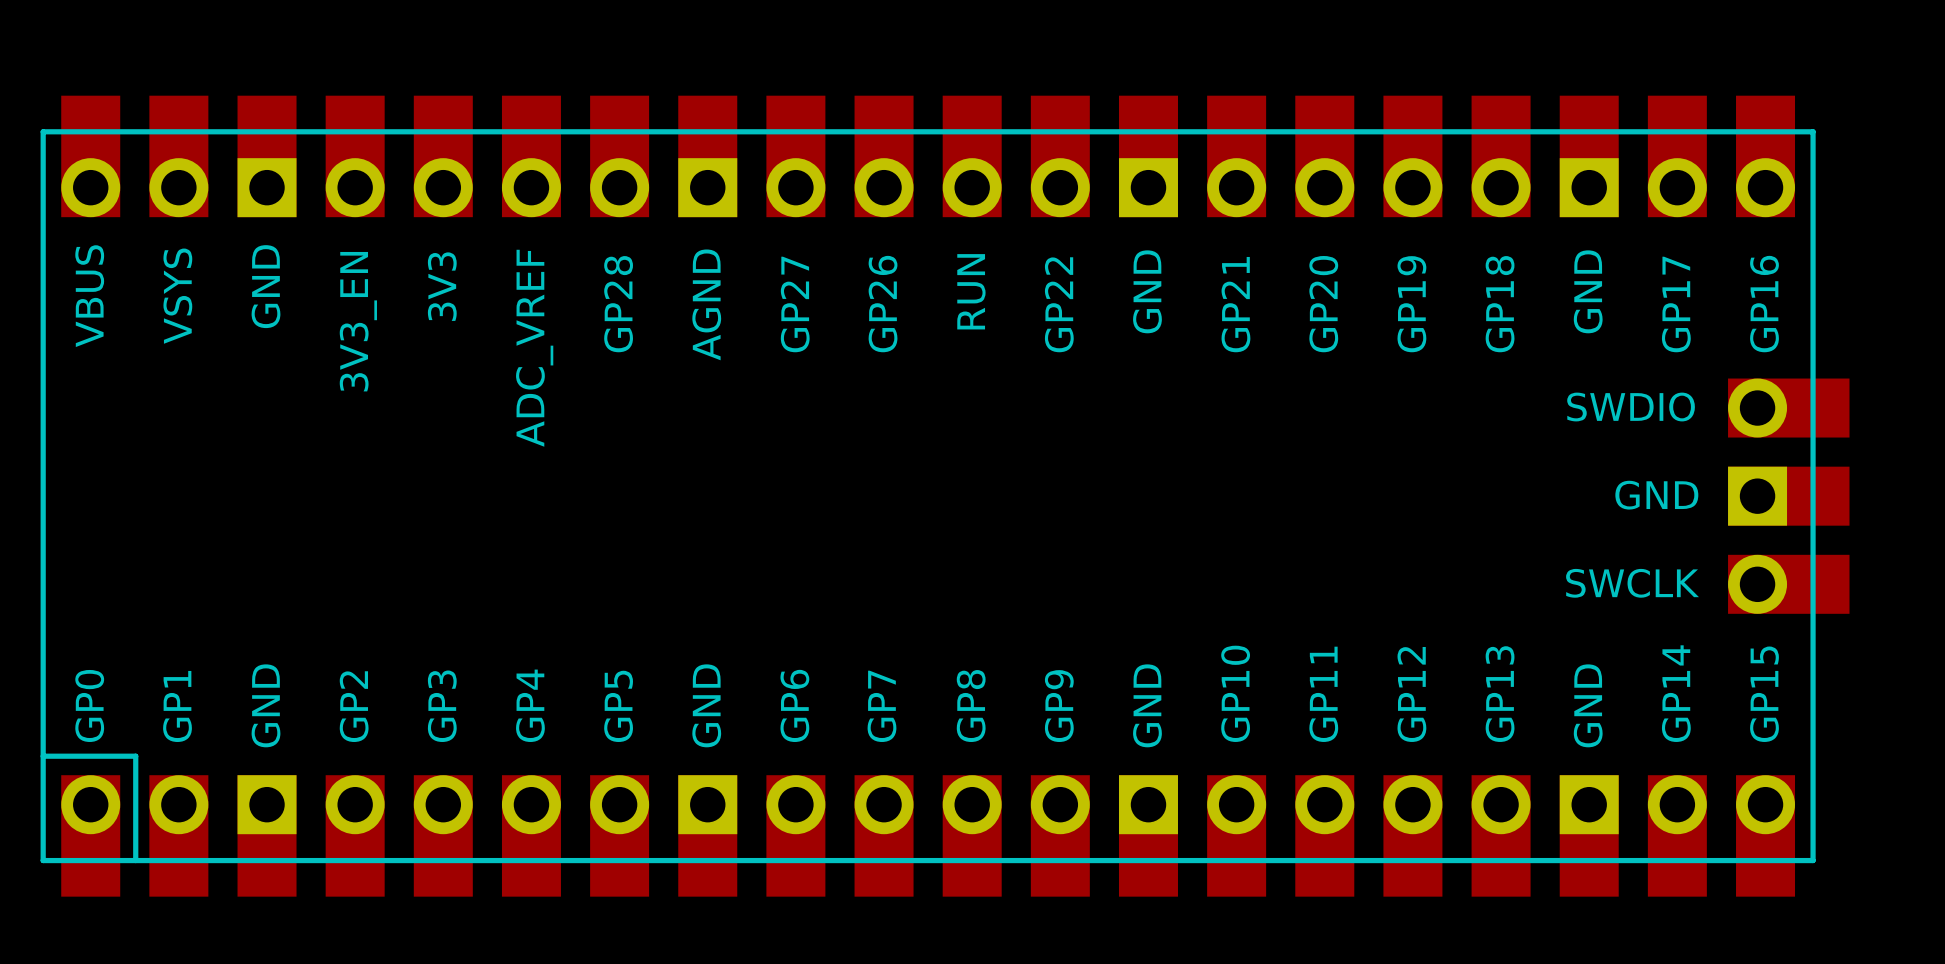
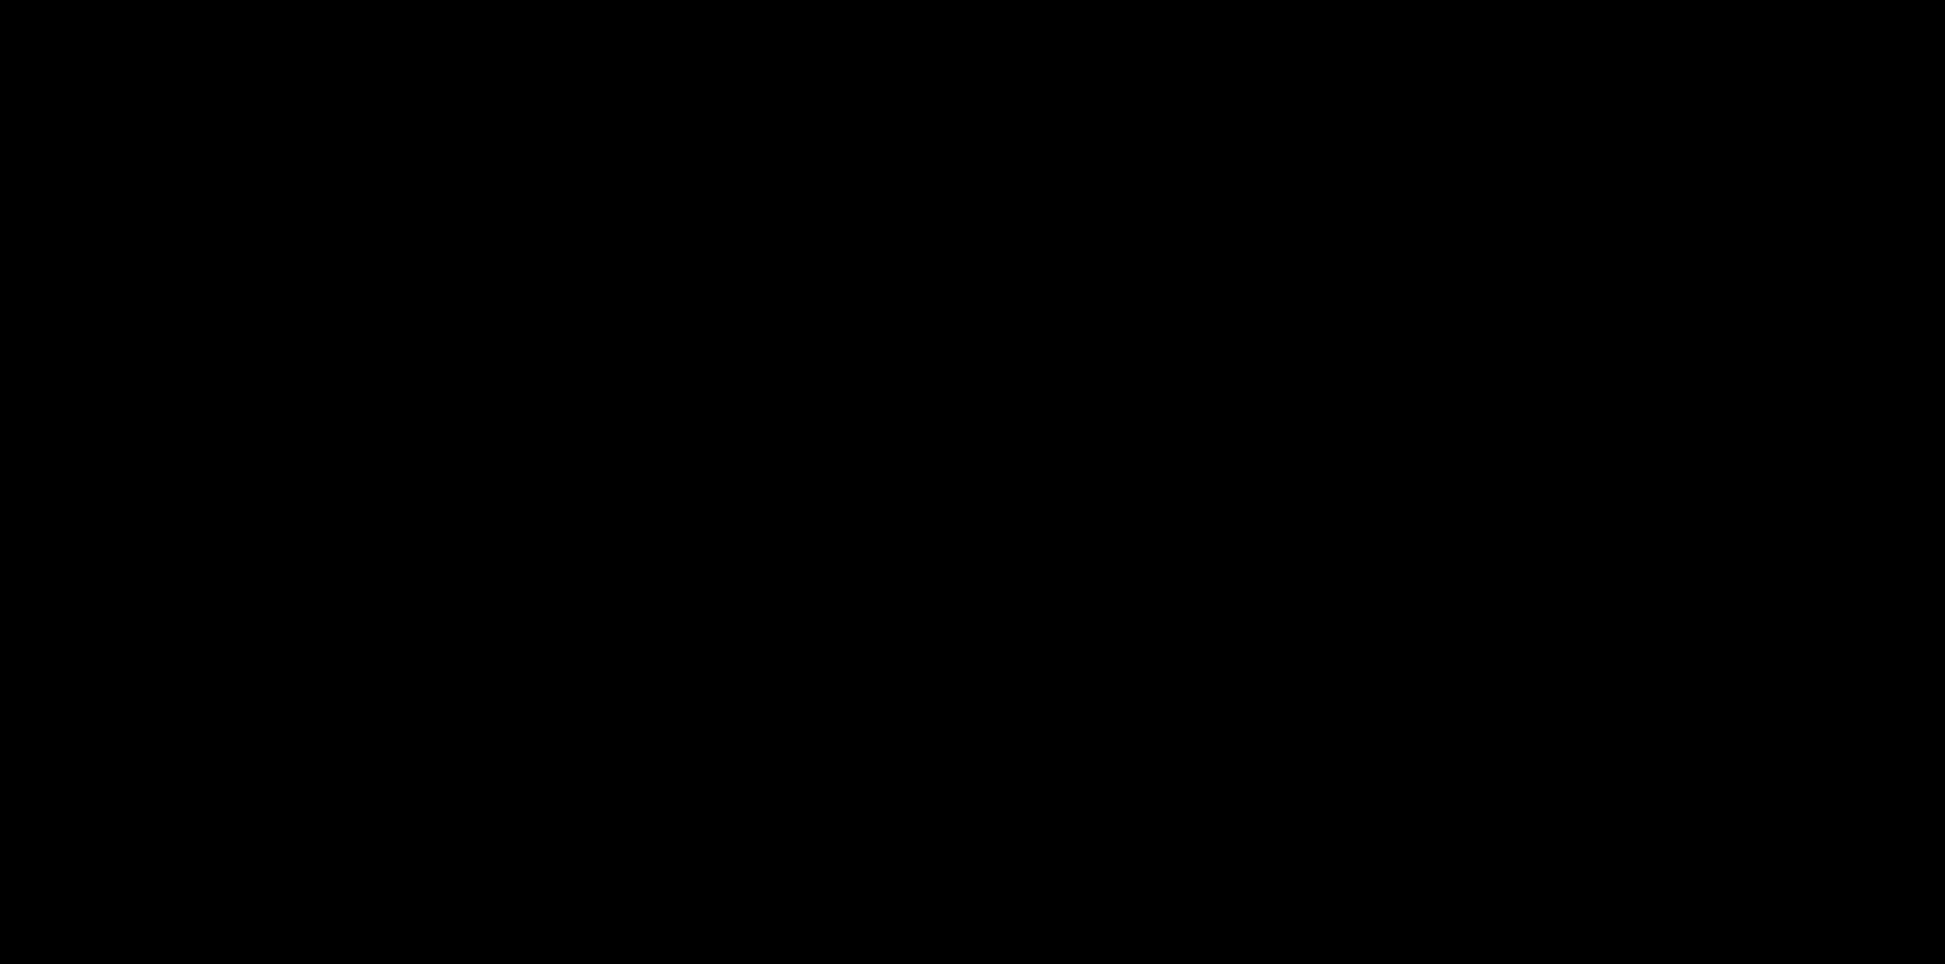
part: (945, 496) -> none

